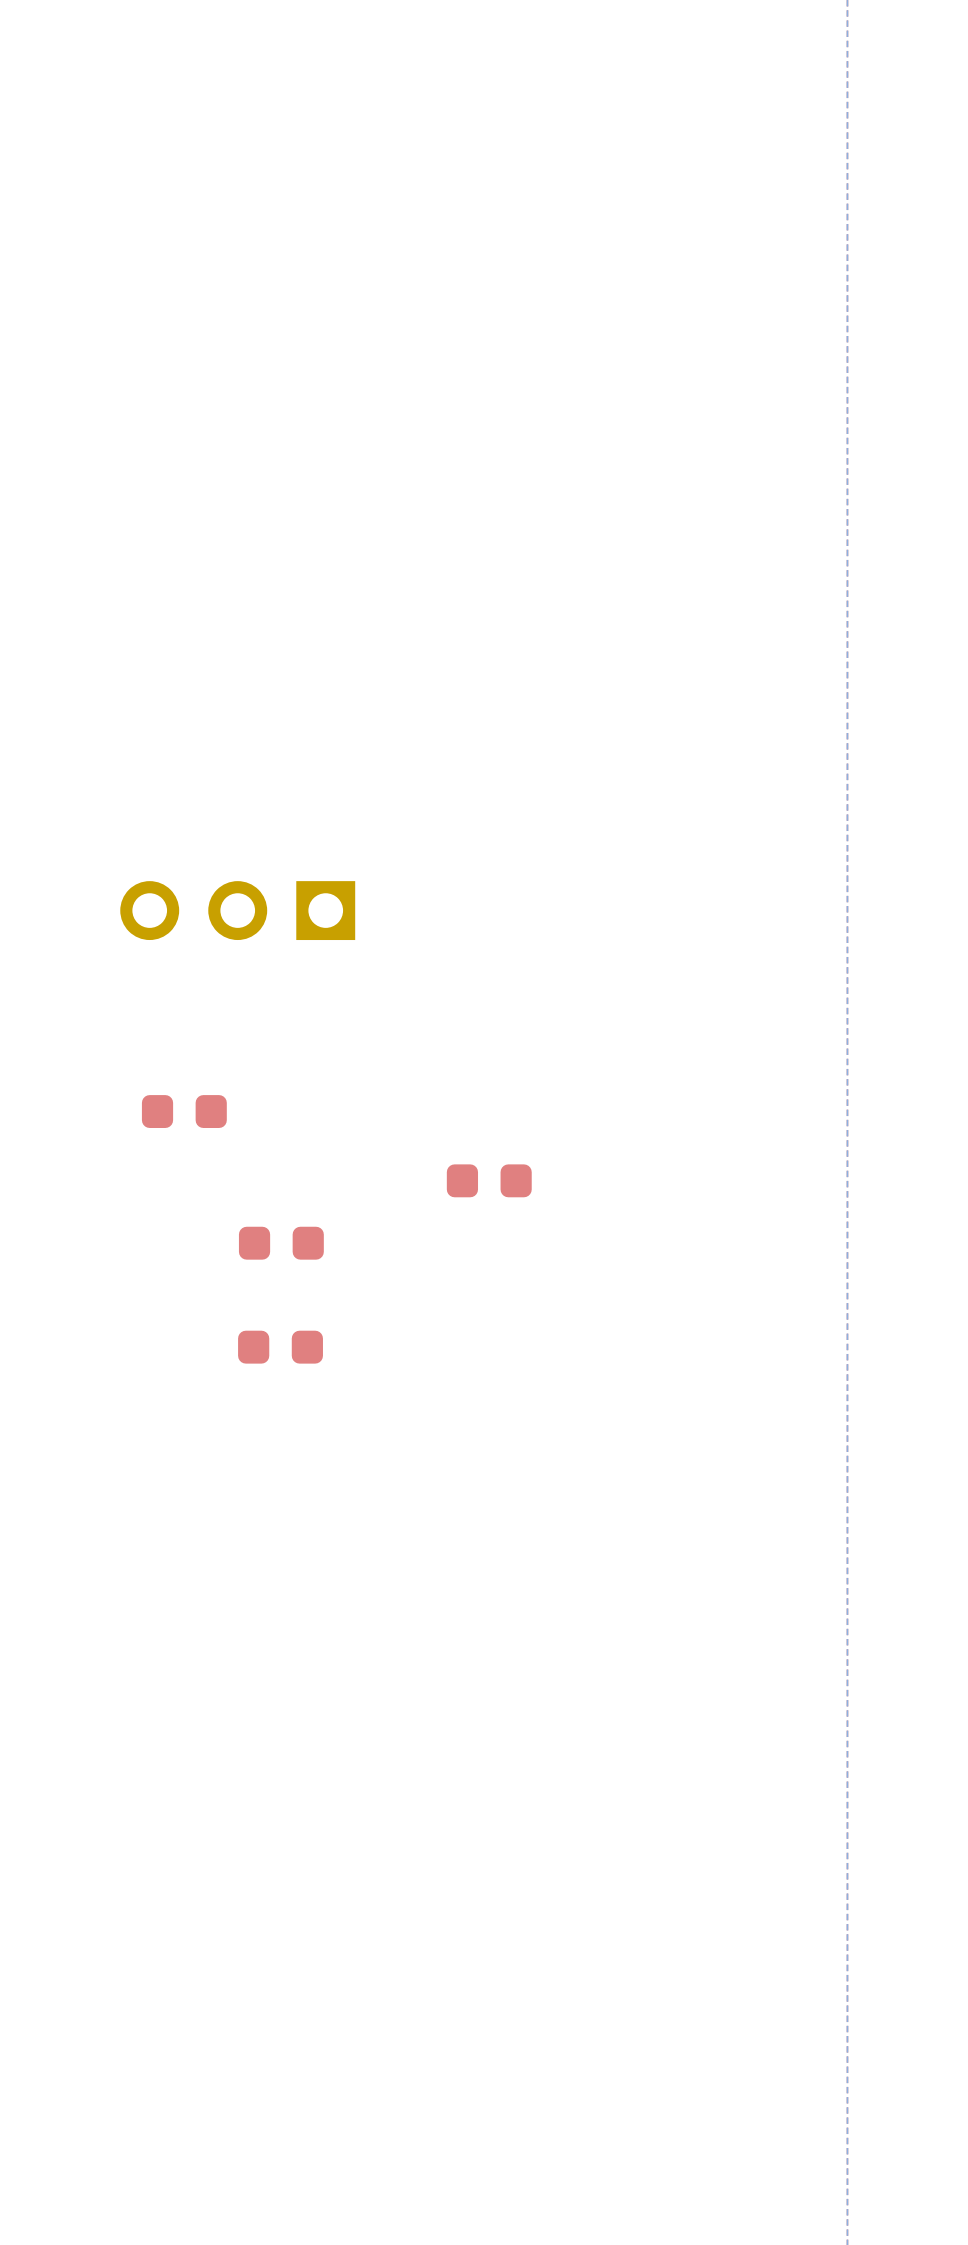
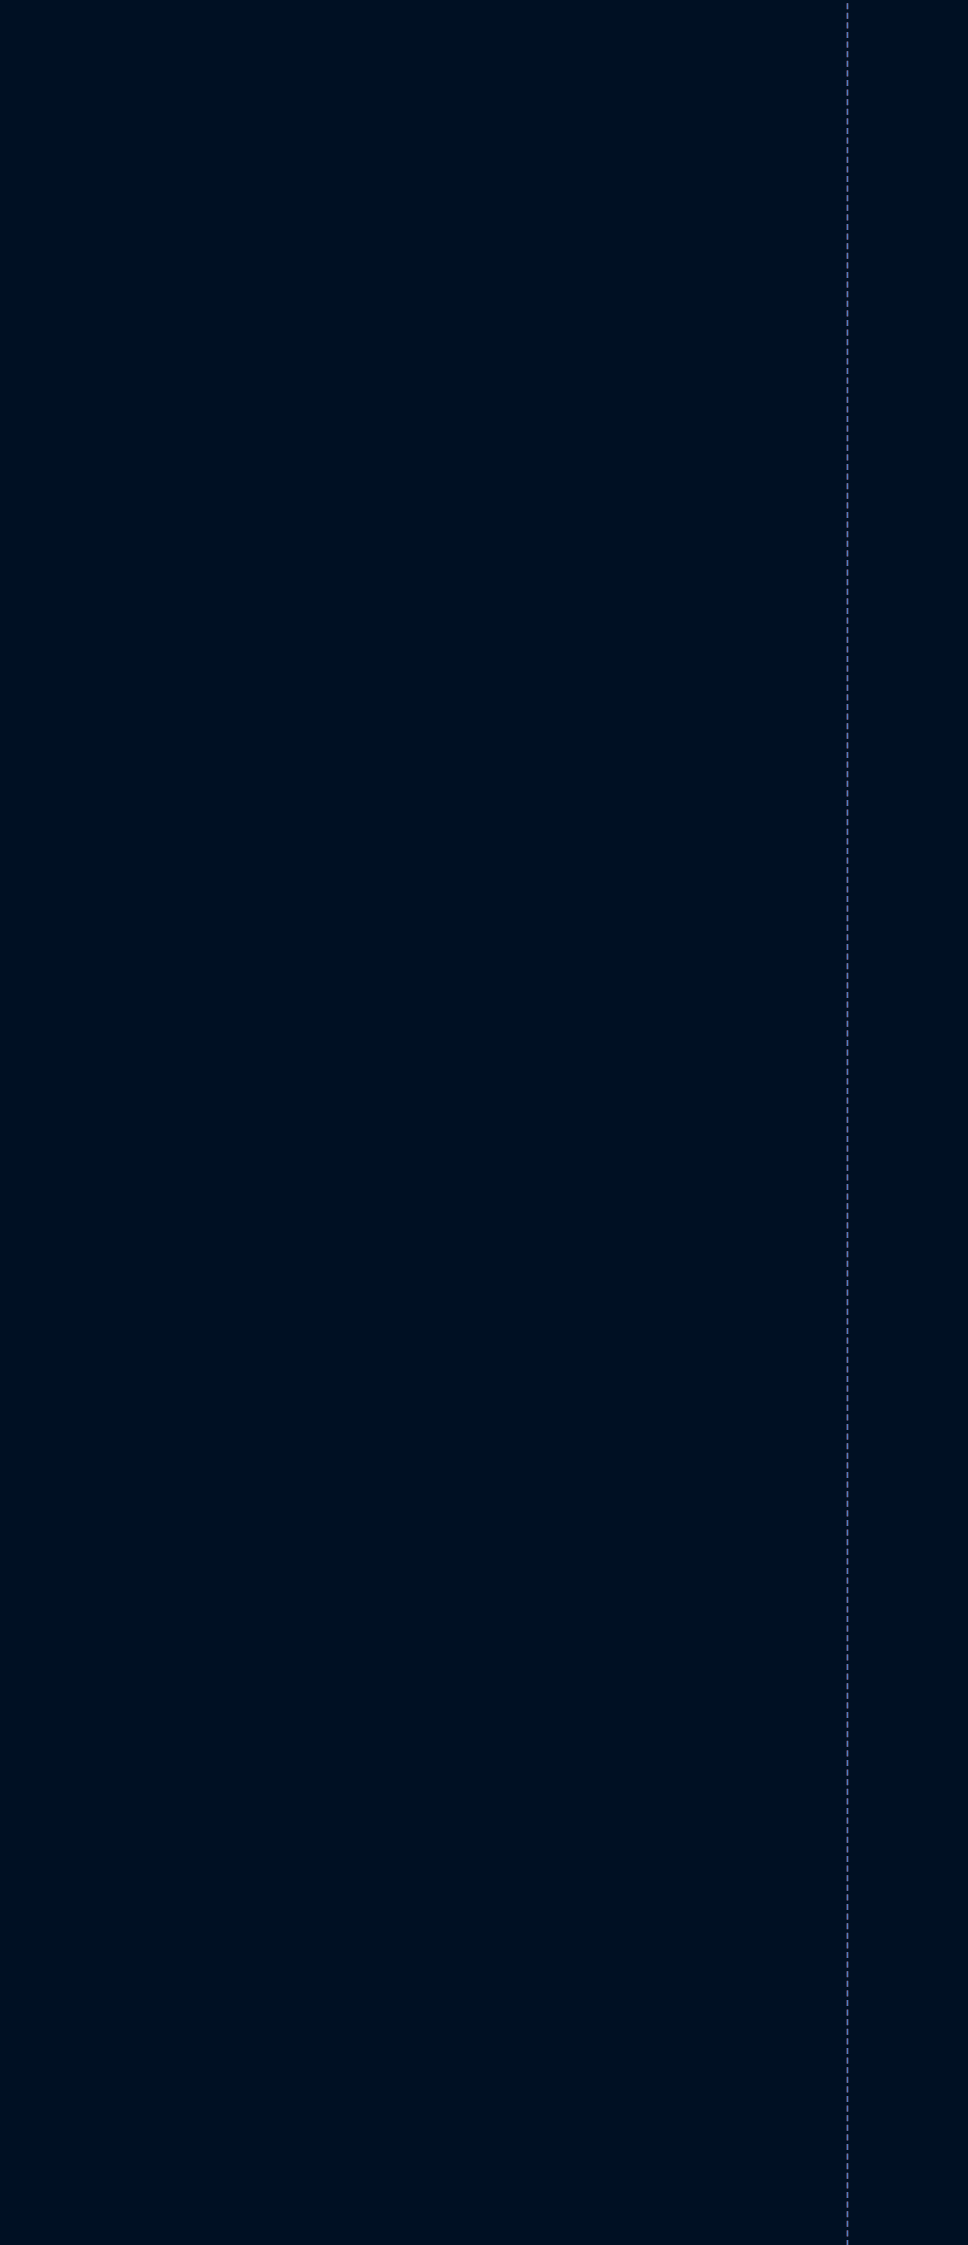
part: (237, 910) -> none
part: (184, 1111) -> none
part: (489, 1180) -> none
part: (281, 1243) -> none
part: (280, 1347) -> none

